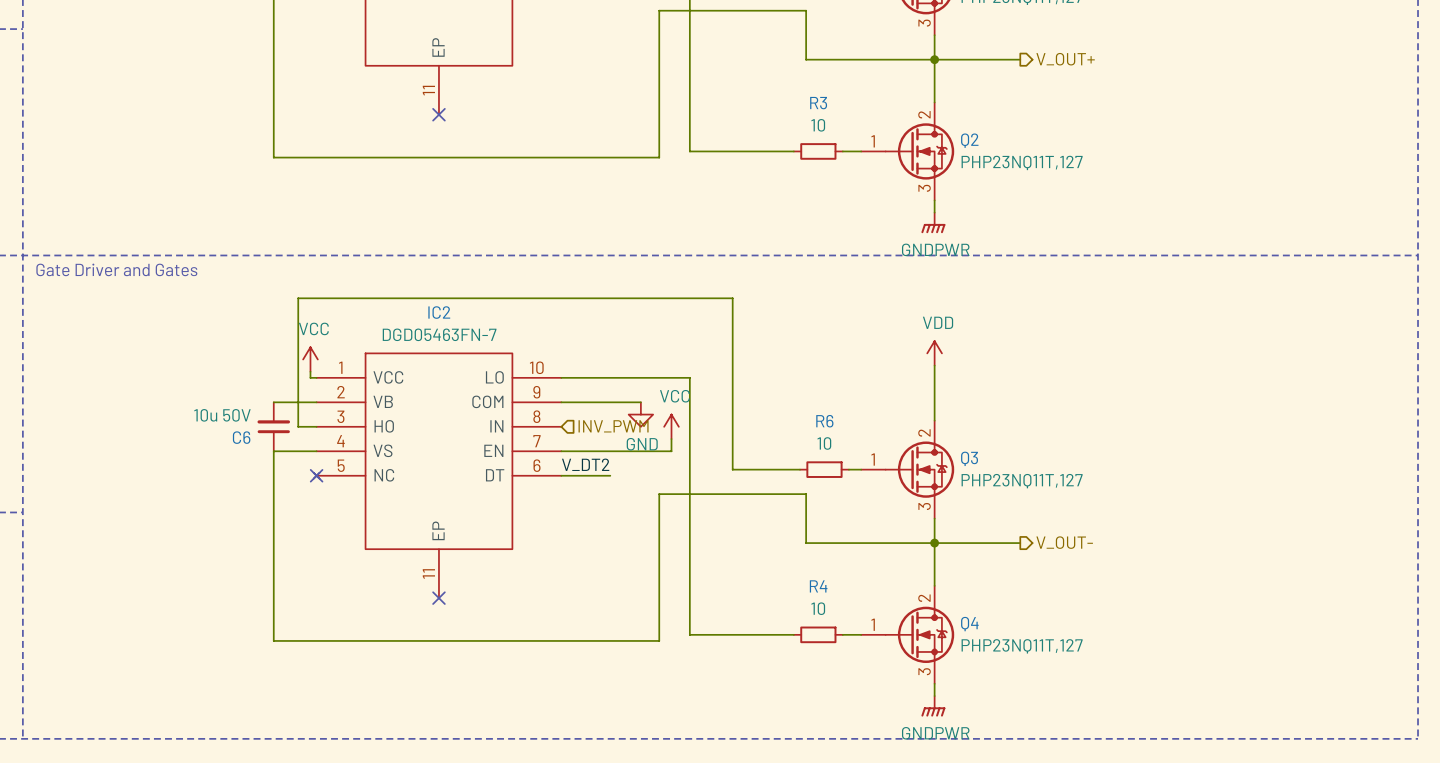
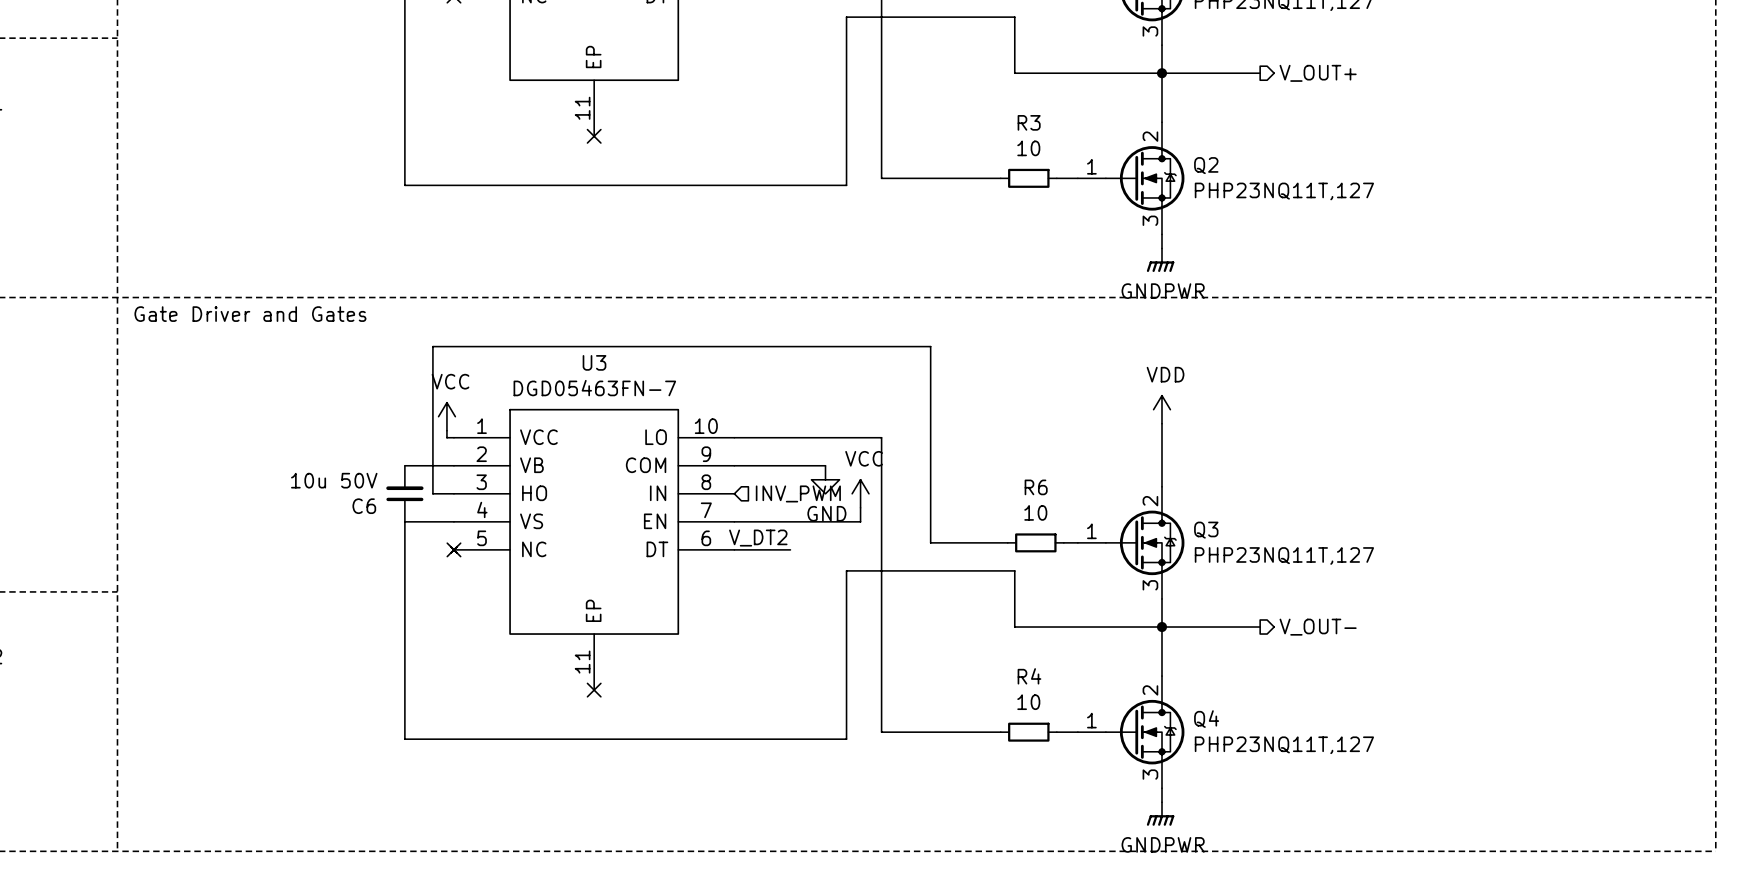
IC2 name: IC2 (439, 312) -> U3 (594, 362)

